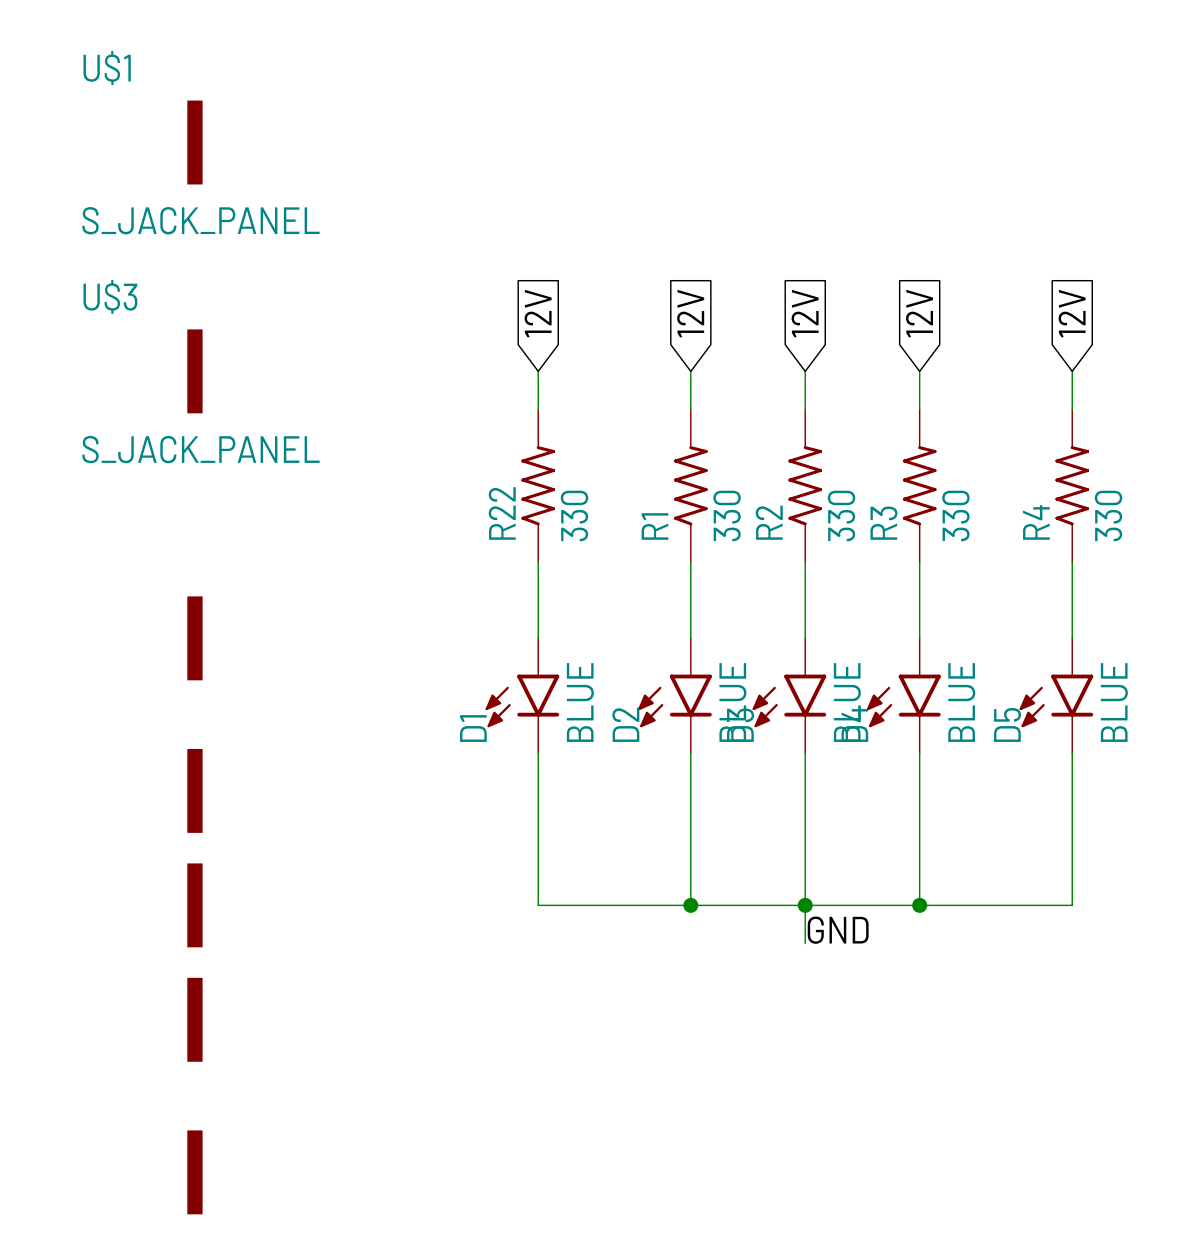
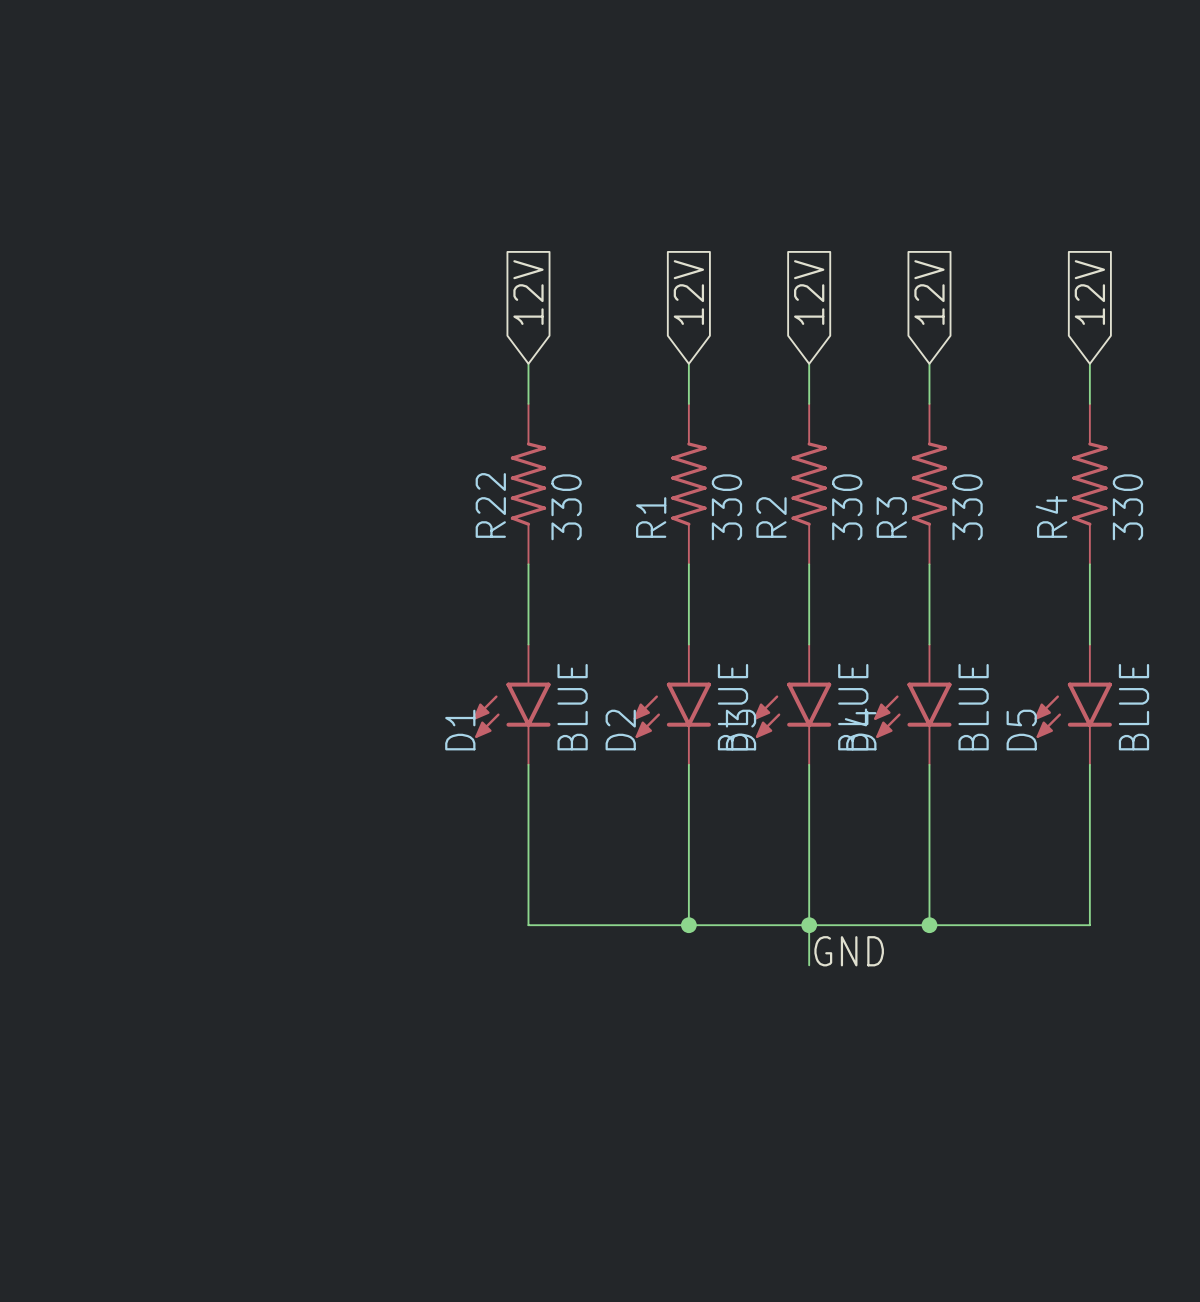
U$1: S_JACK_PANEL (194, 142) -> none
U$3: S_JACK_PANEL (194, 371) -> none
part: (194, 638) -> none
part: (194, 790) -> none
part: (194, 905) -> none
part: (194, 1019) -> none
part: (194, 1172) -> none

